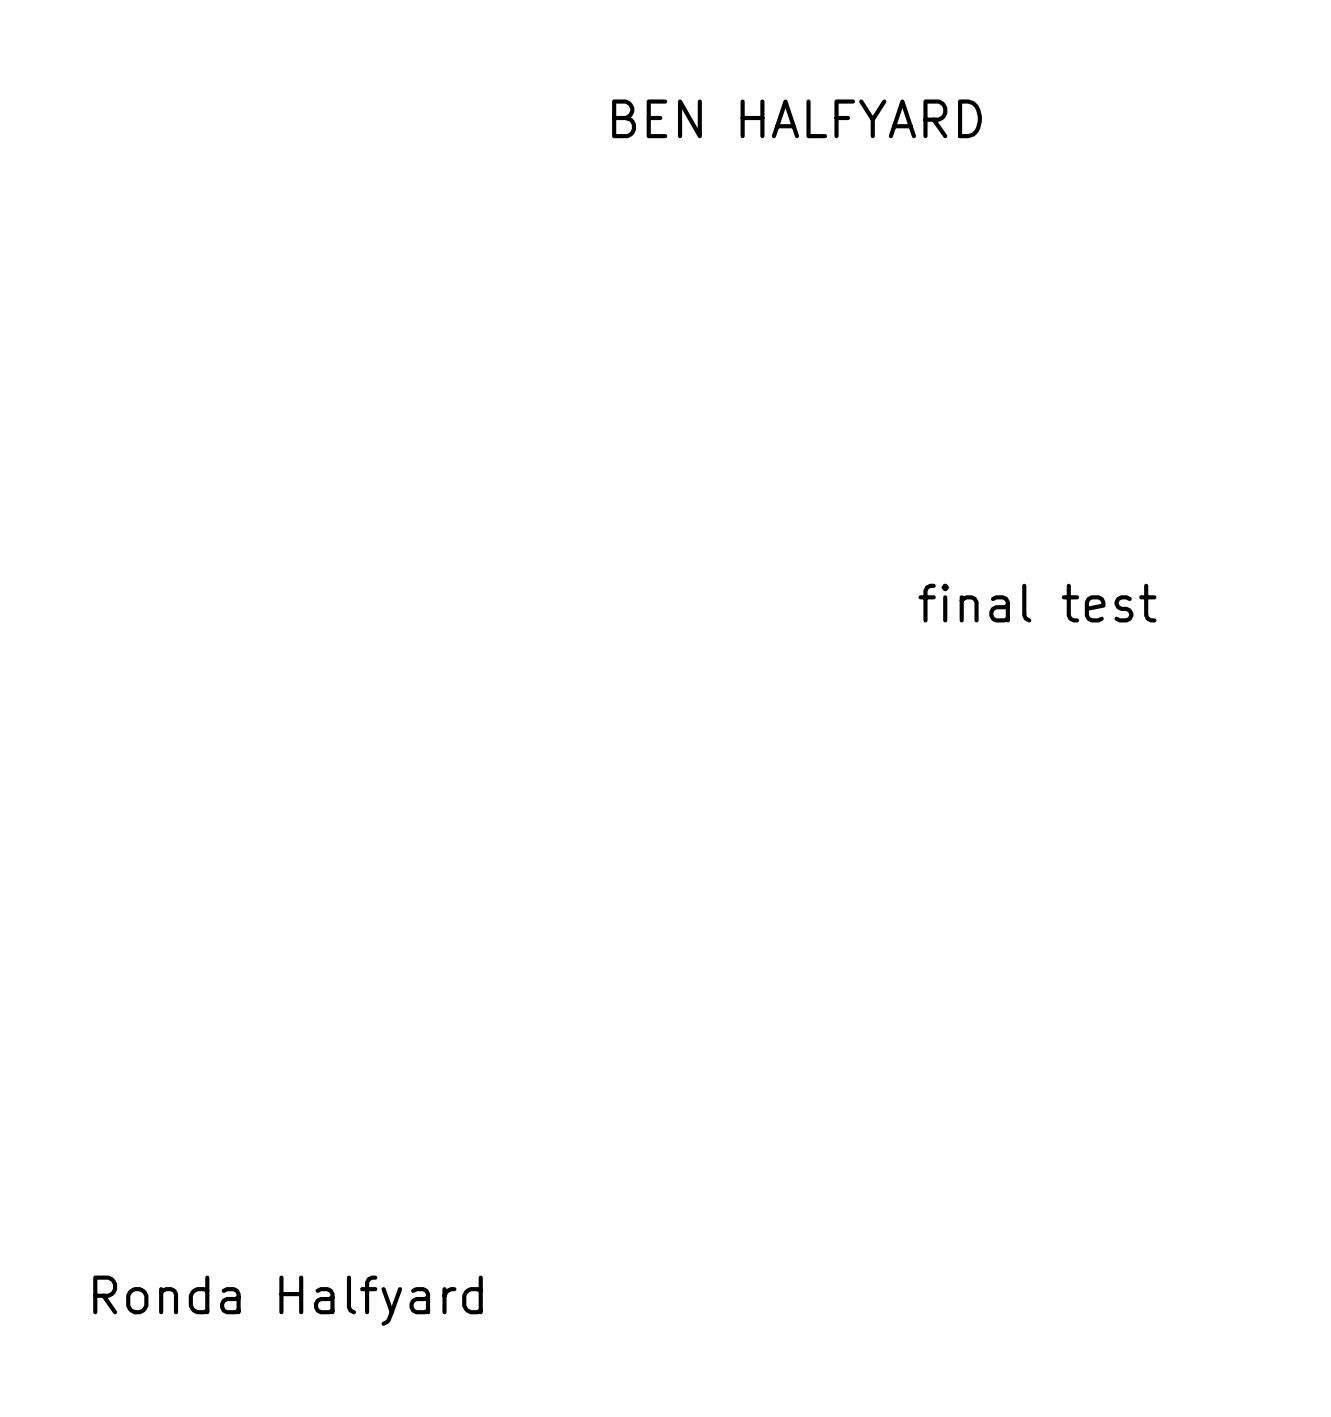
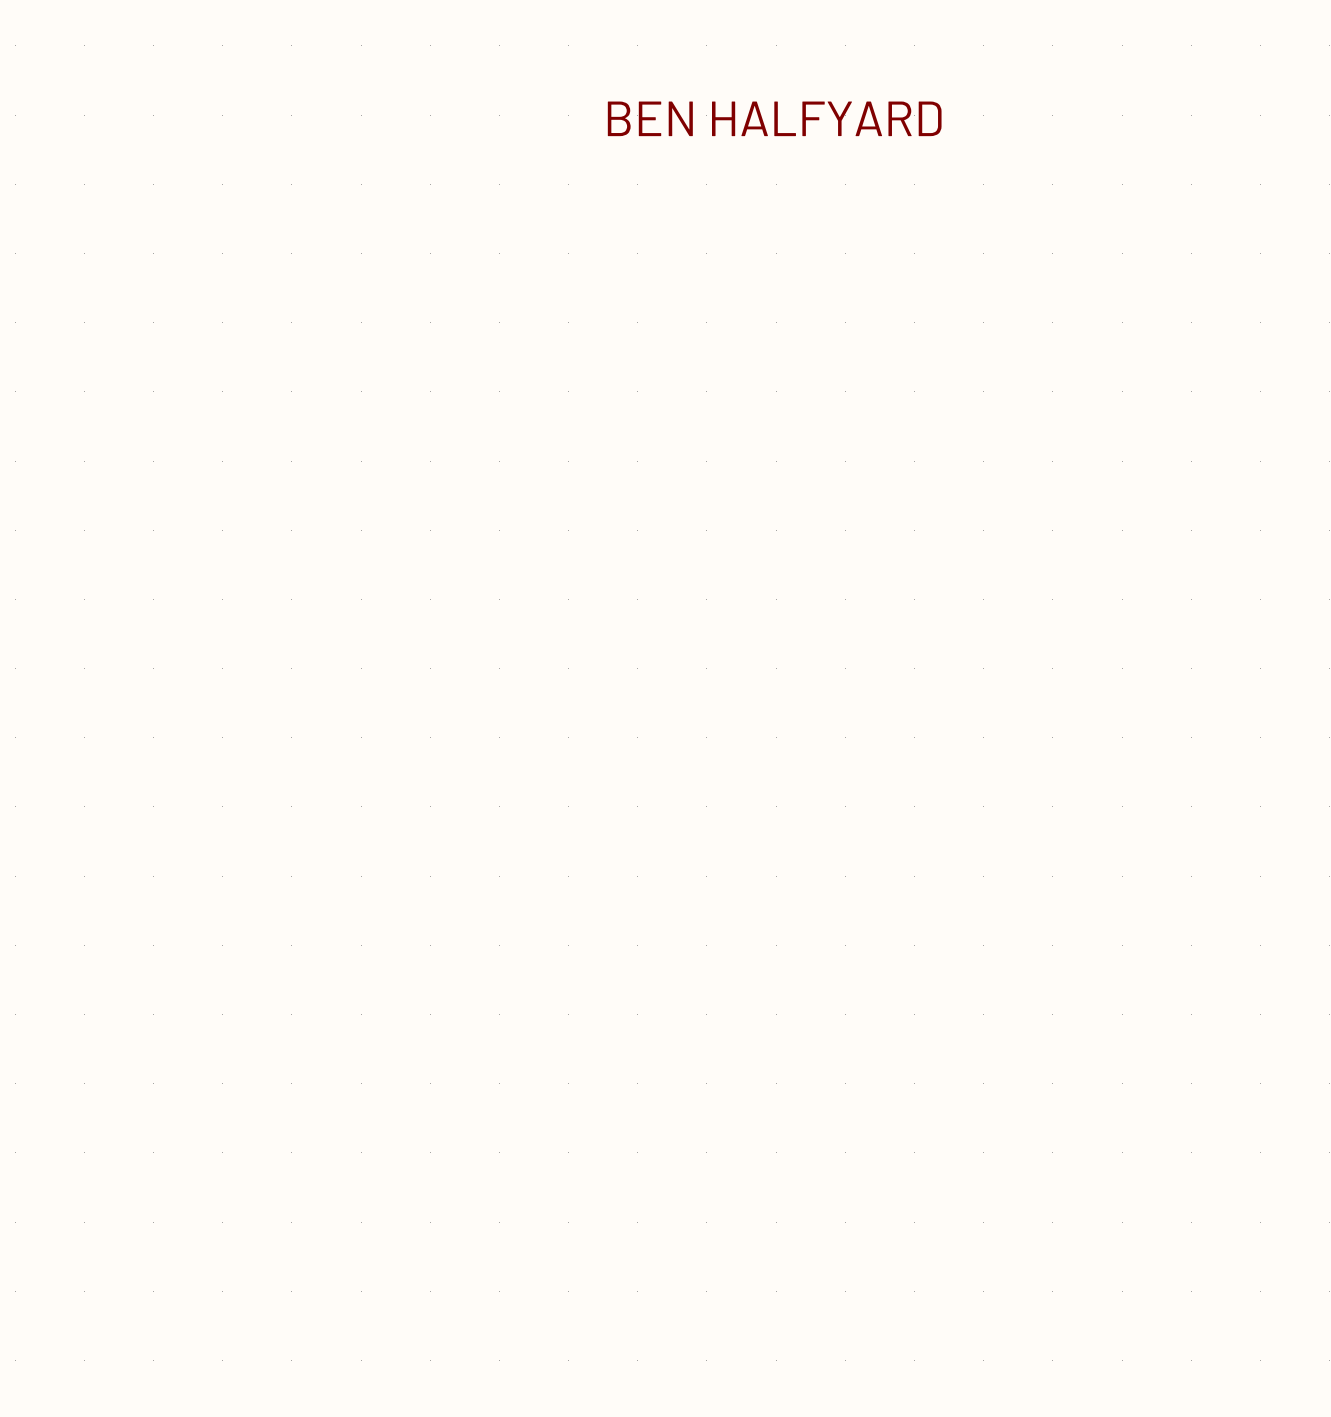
label: final test (1037, 603) -> none
label: Ronda Halfyard (288, 1300) -> none

